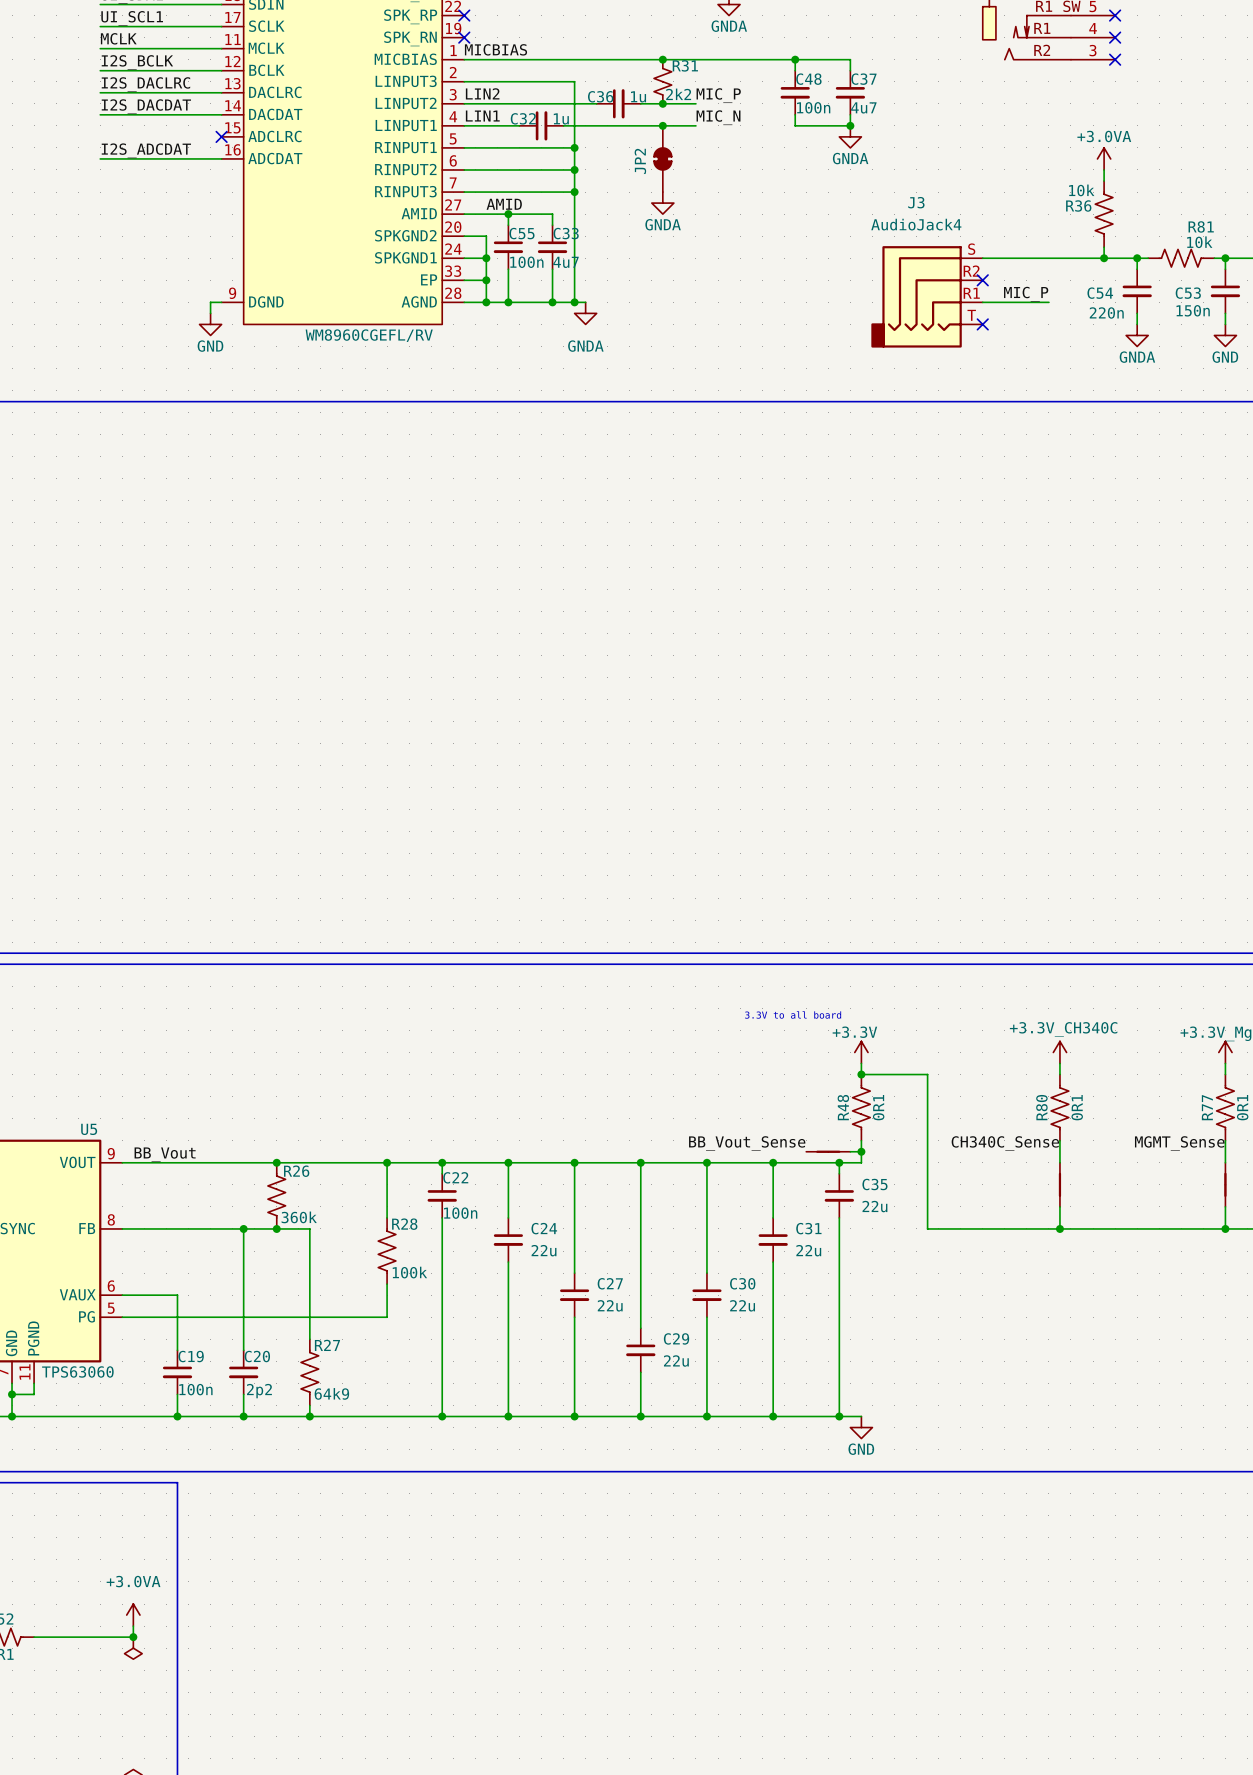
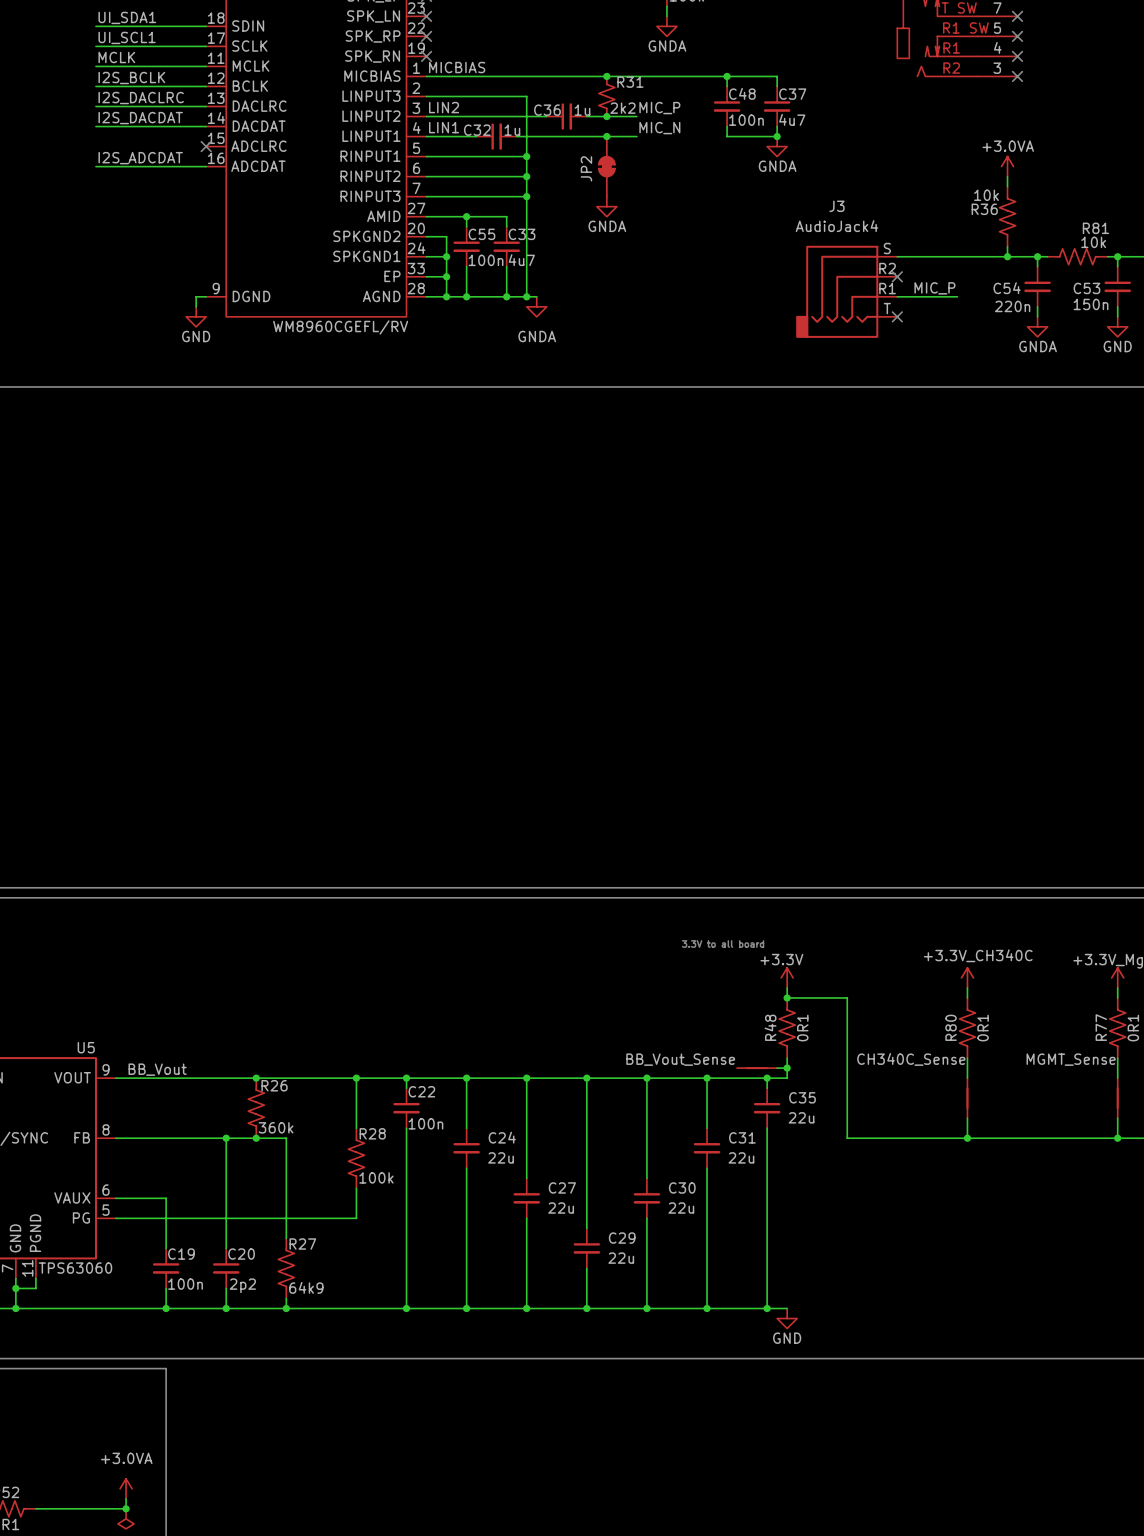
label: AMID (504, 204) -> none

